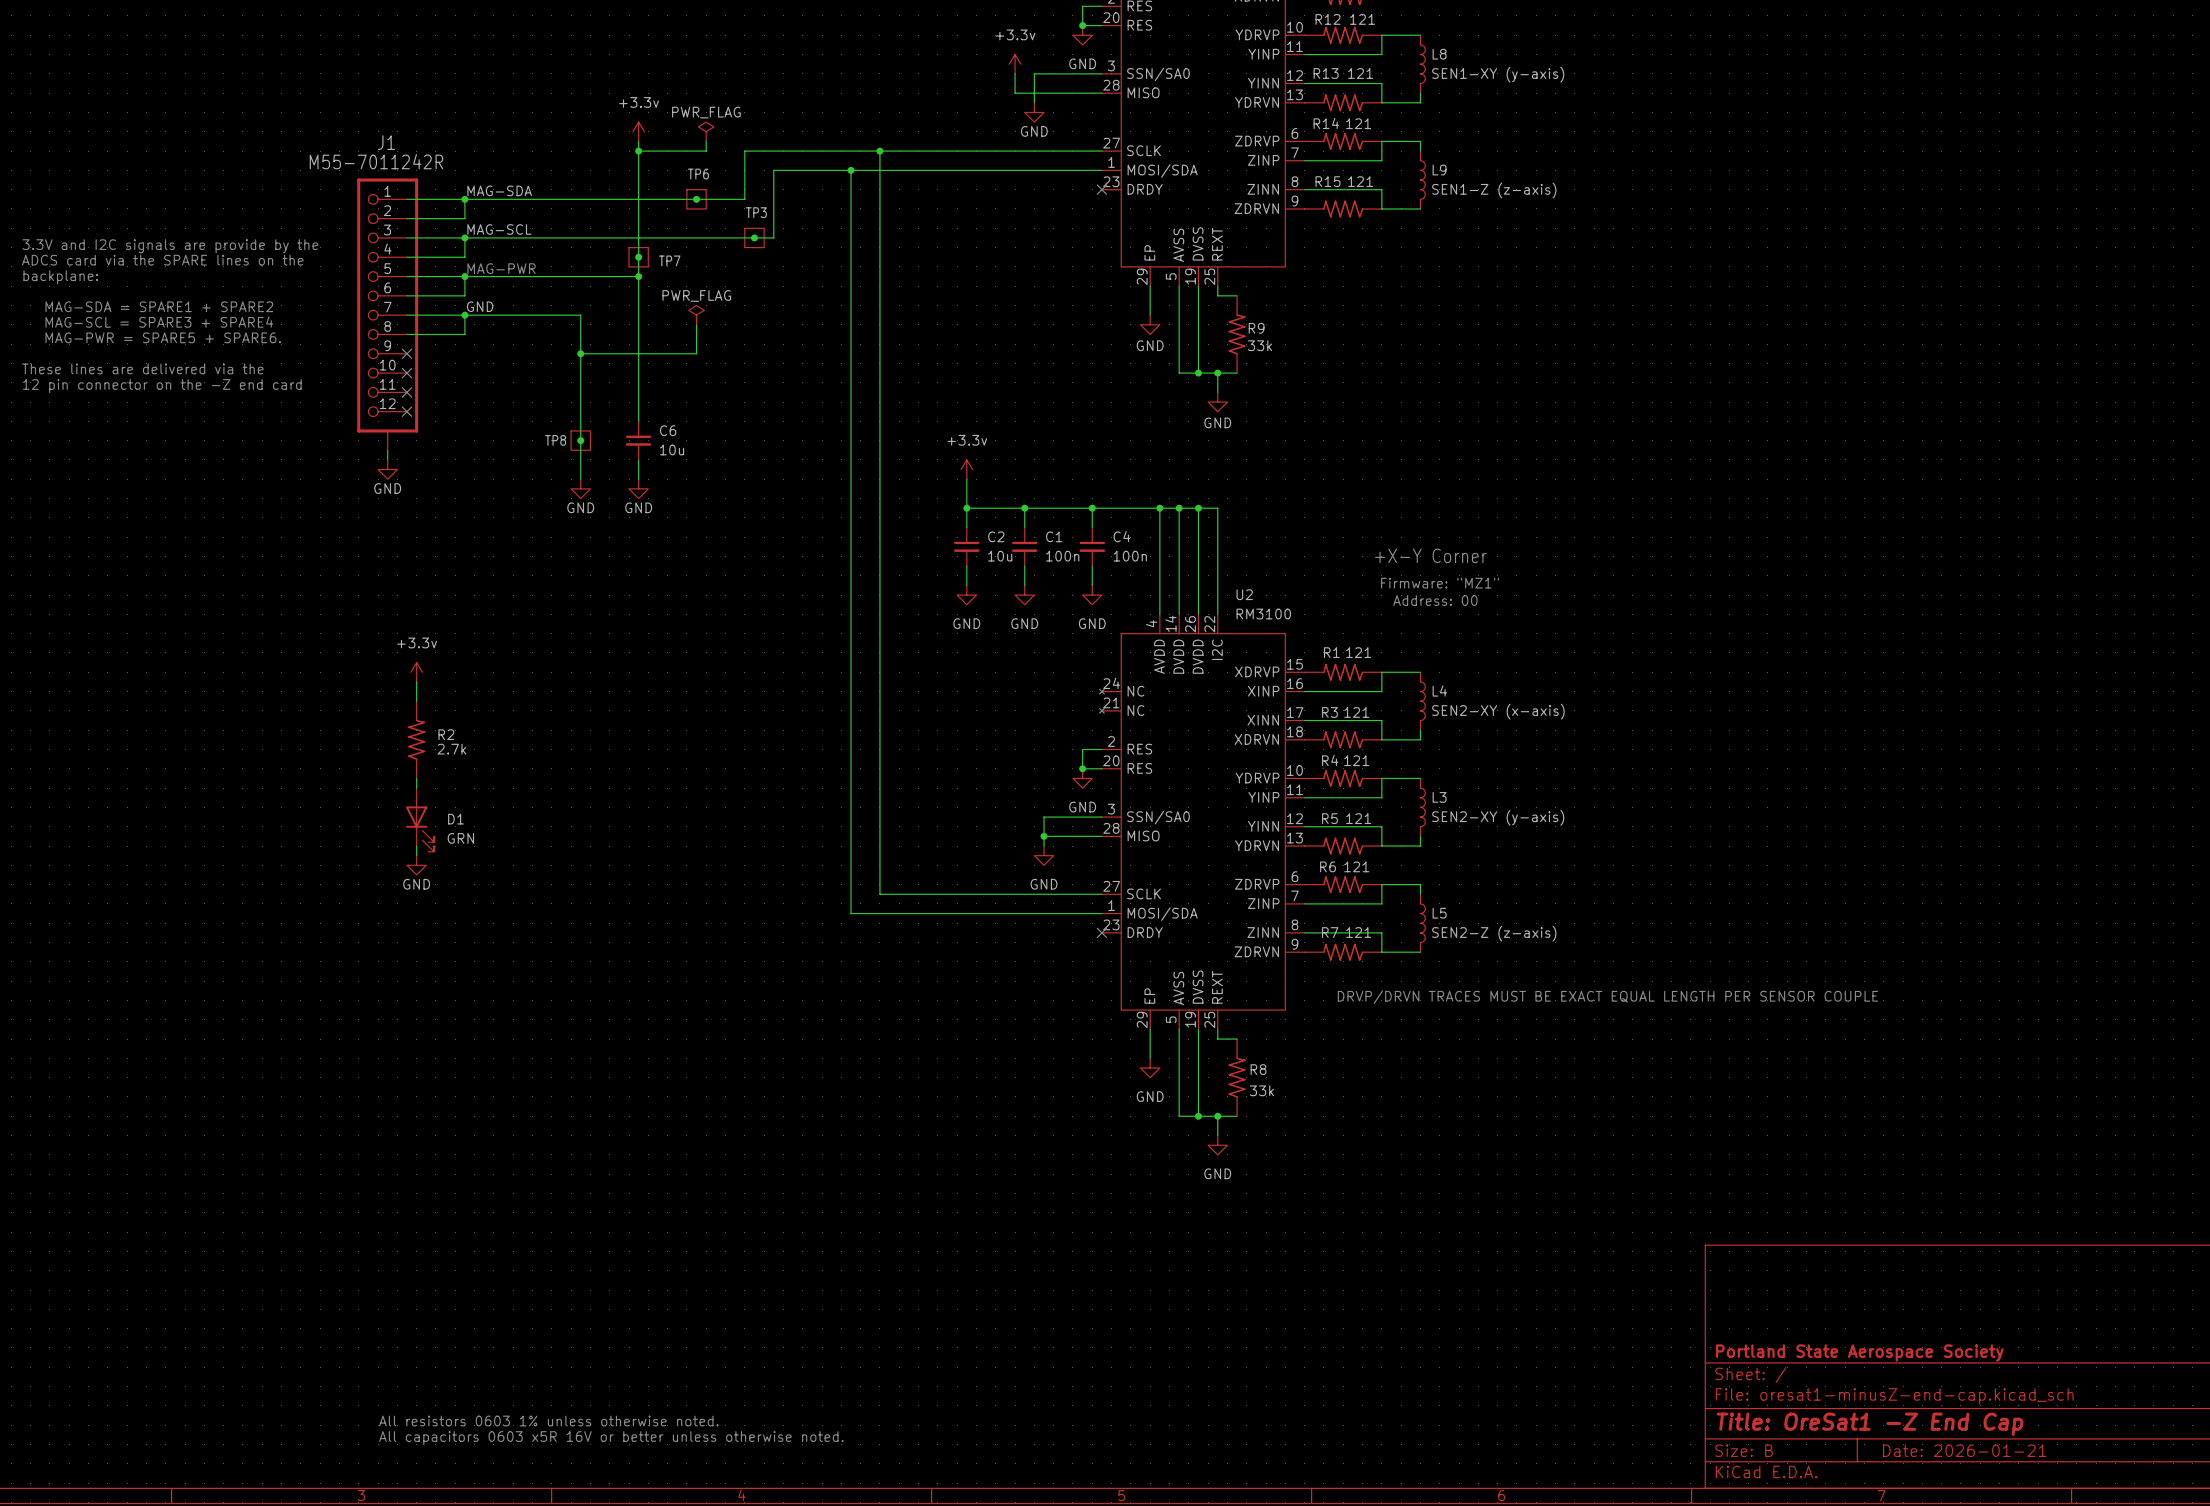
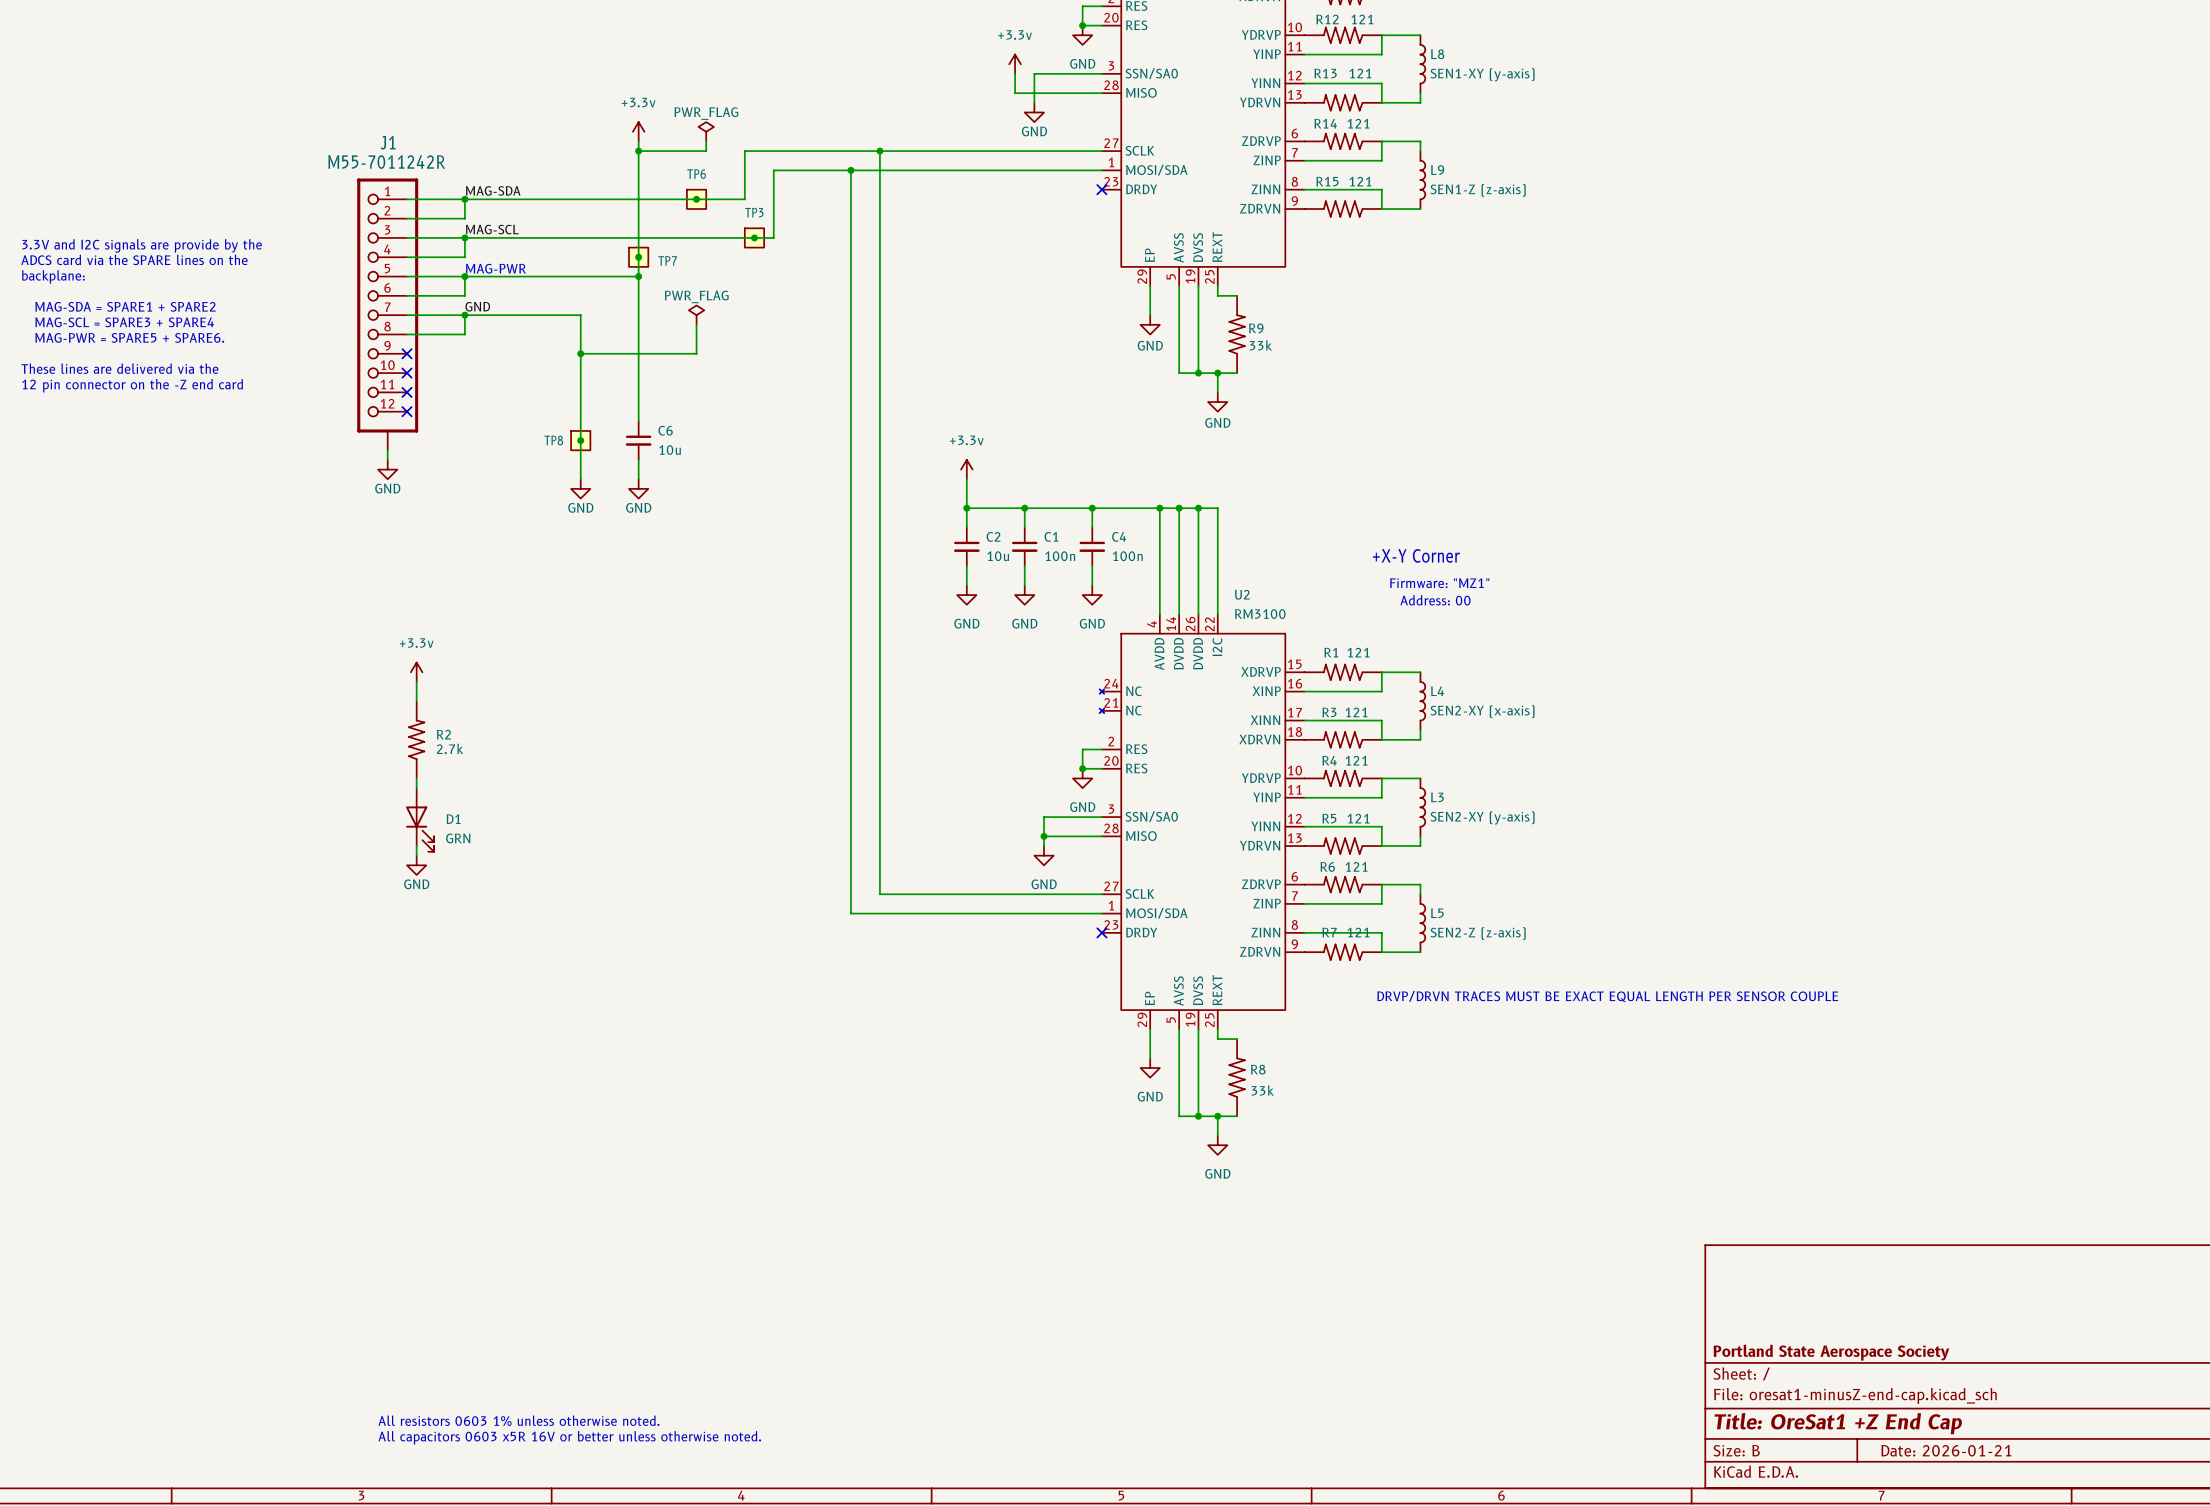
title block: Title: OreSat1 -Z End Cap (1870, 1424) -> Title: OreSat1 +Z End Cap (1838, 1423)

